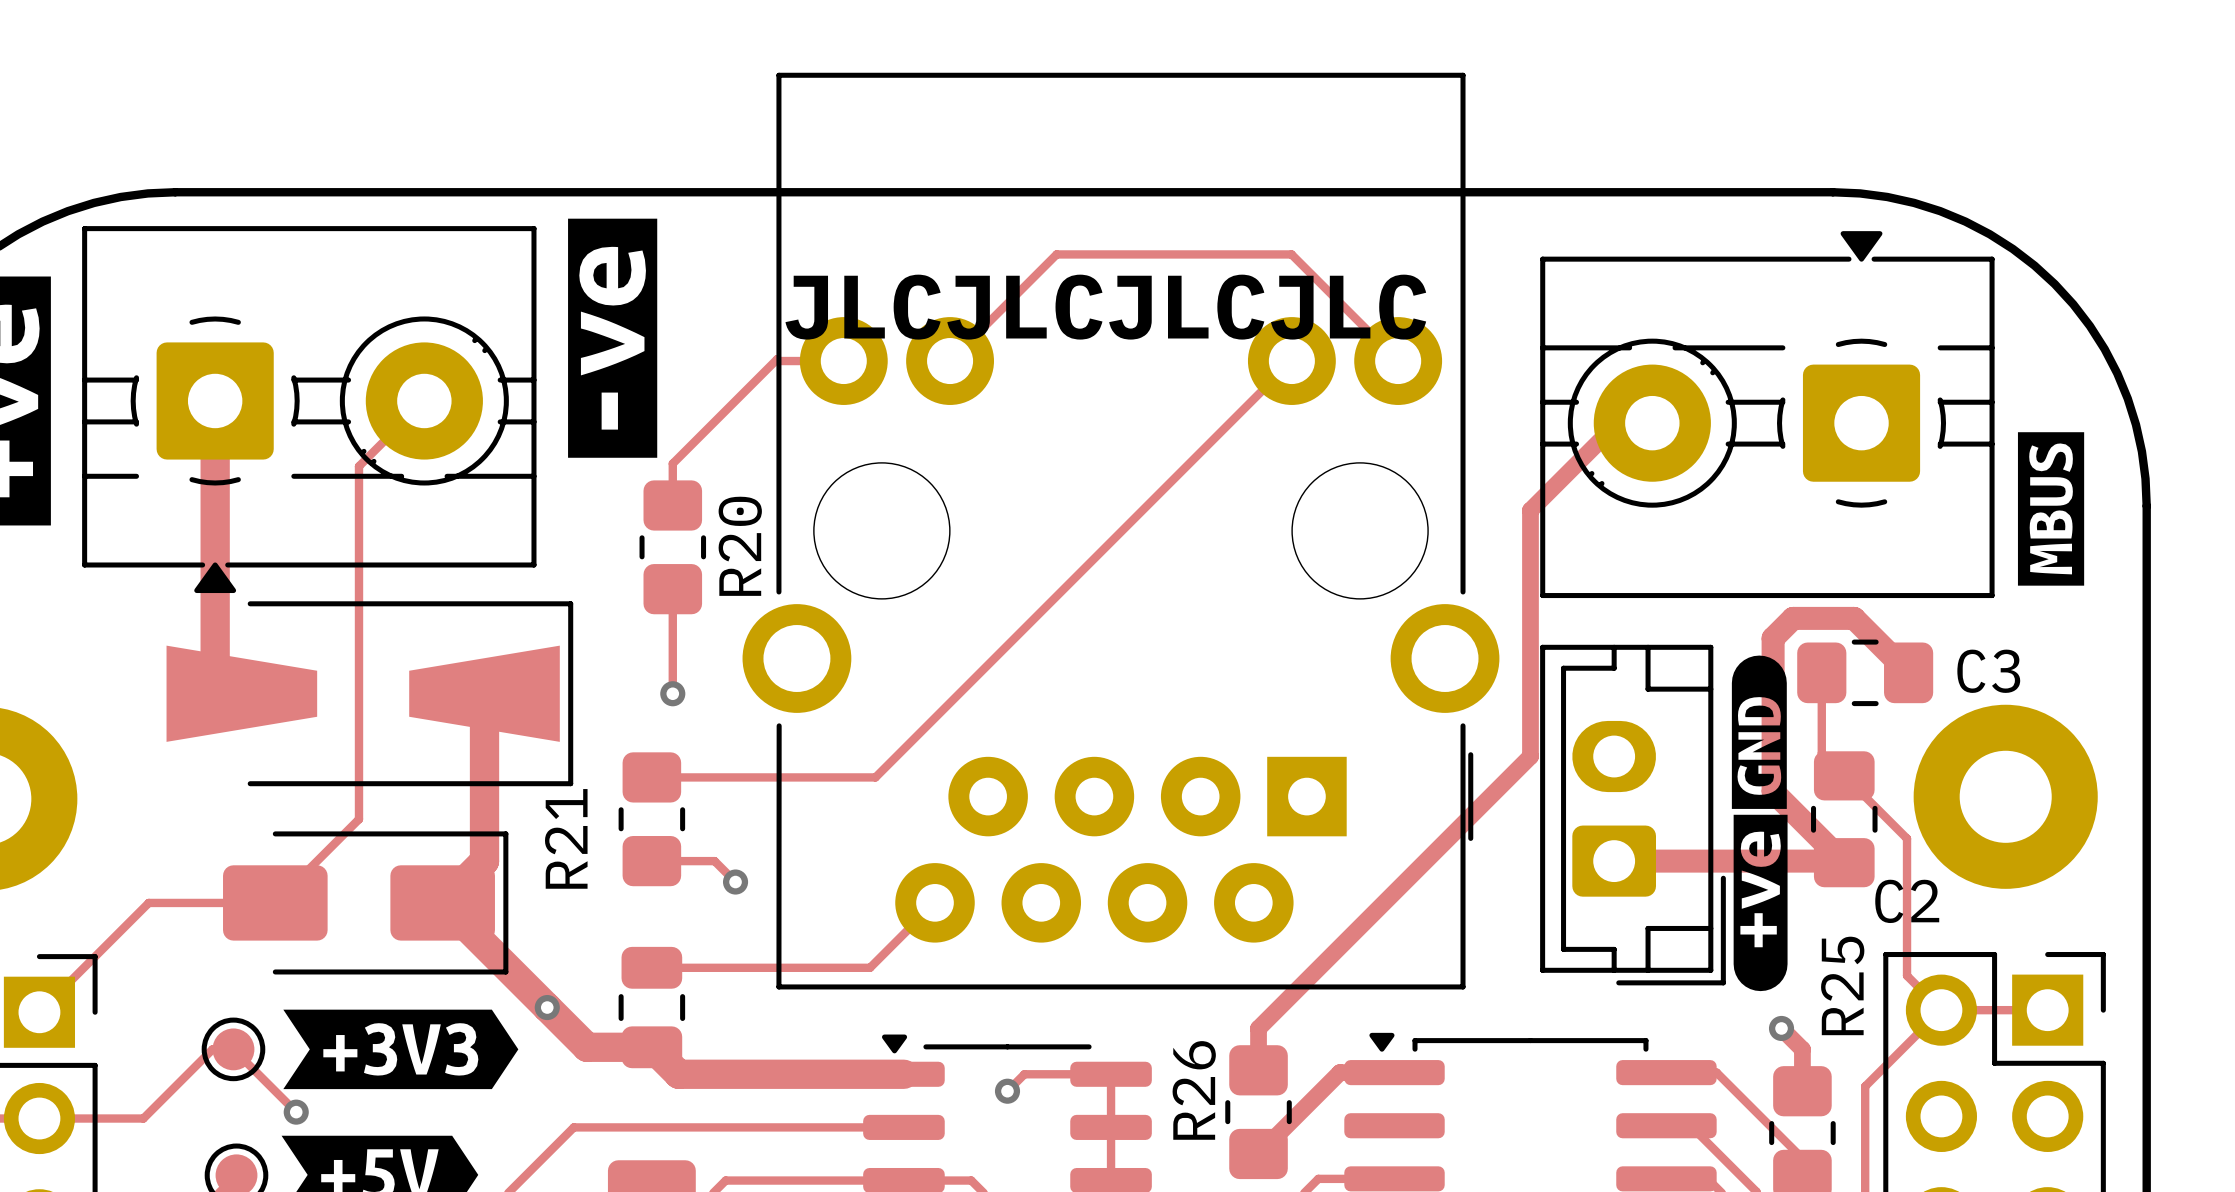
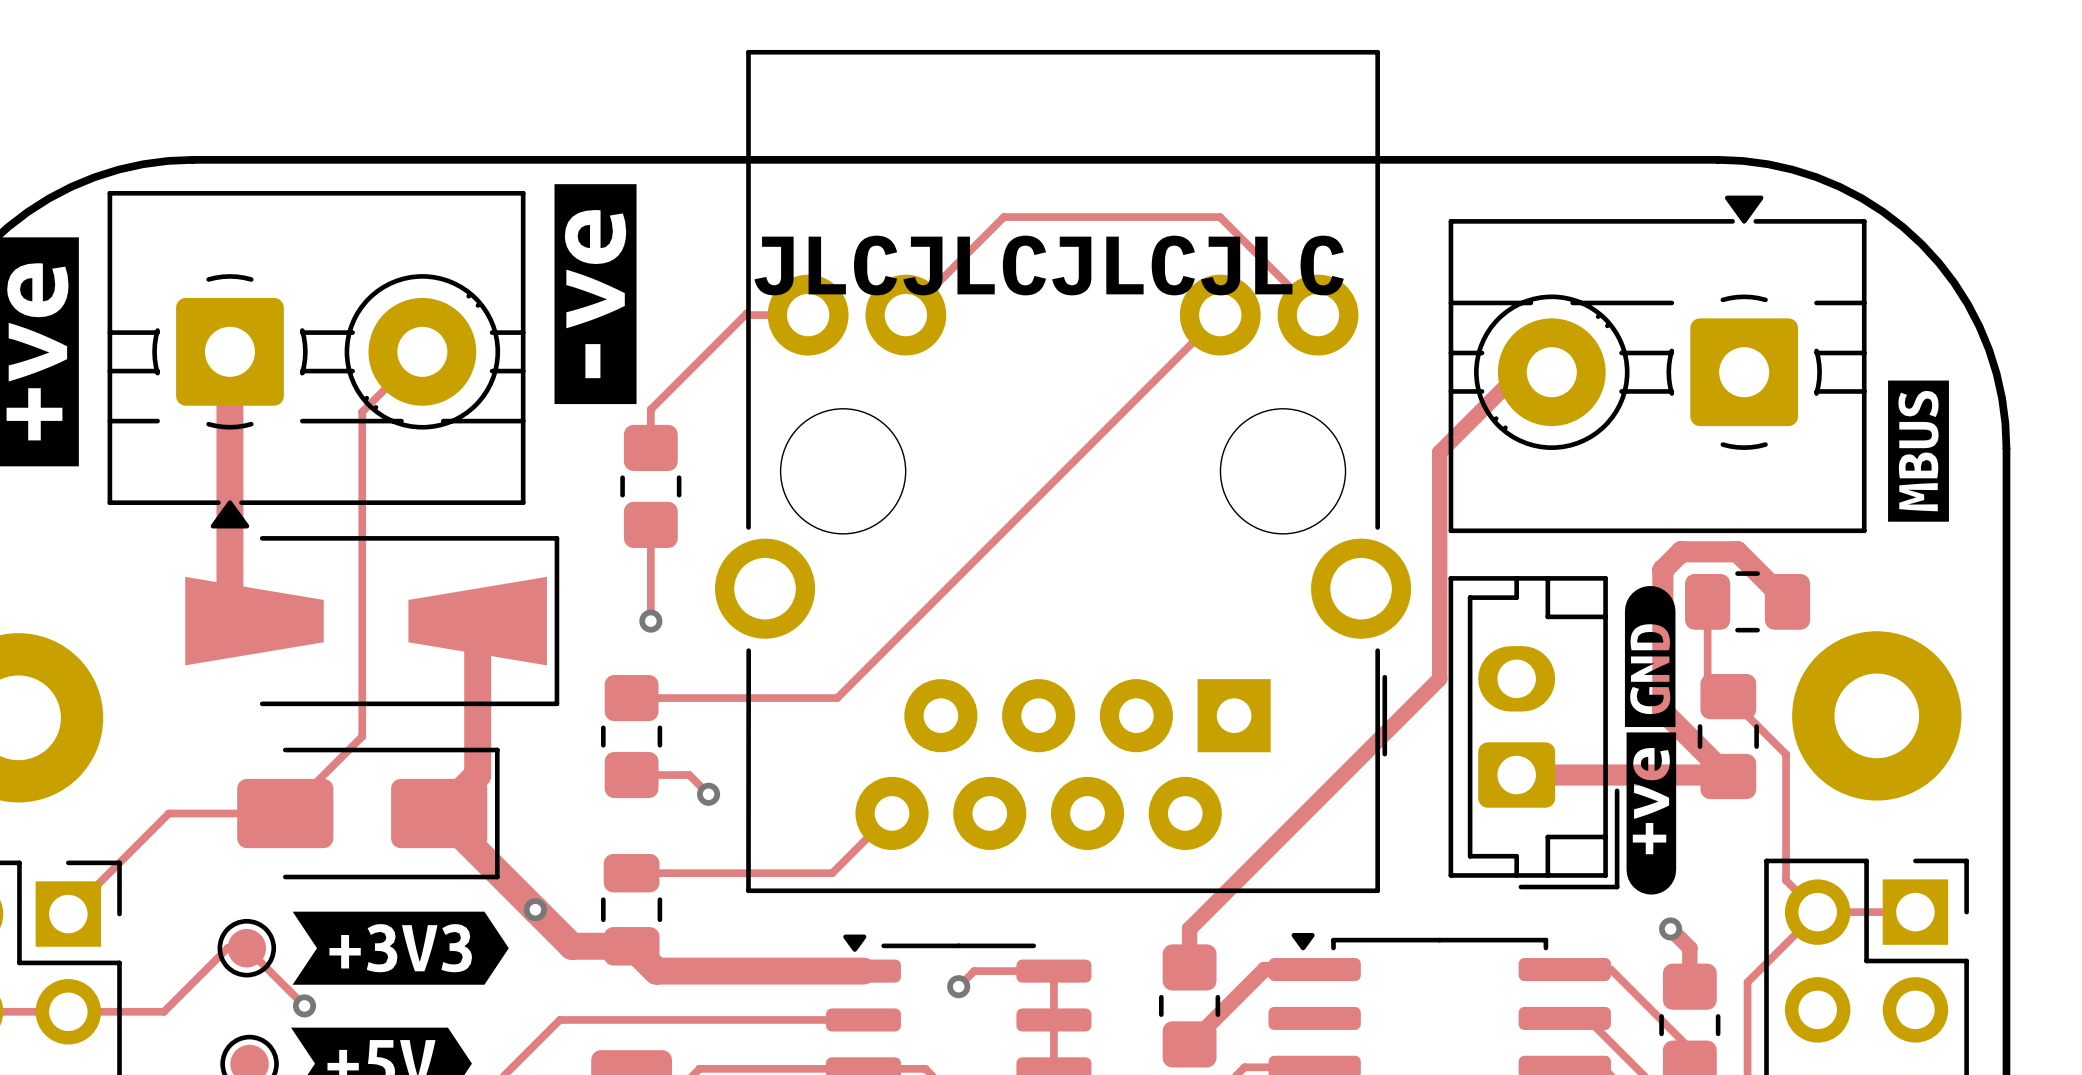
R20 name: R20 (740, 546) -> none
C3 name: C3 (1988, 671) -> none
R21 name: R21 (566, 838) -> none
C2 name: C2 (1907, 901) -> none
R25 name: R25 (1842, 985) -> none
R26 name: R26 (1194, 1090) -> none

